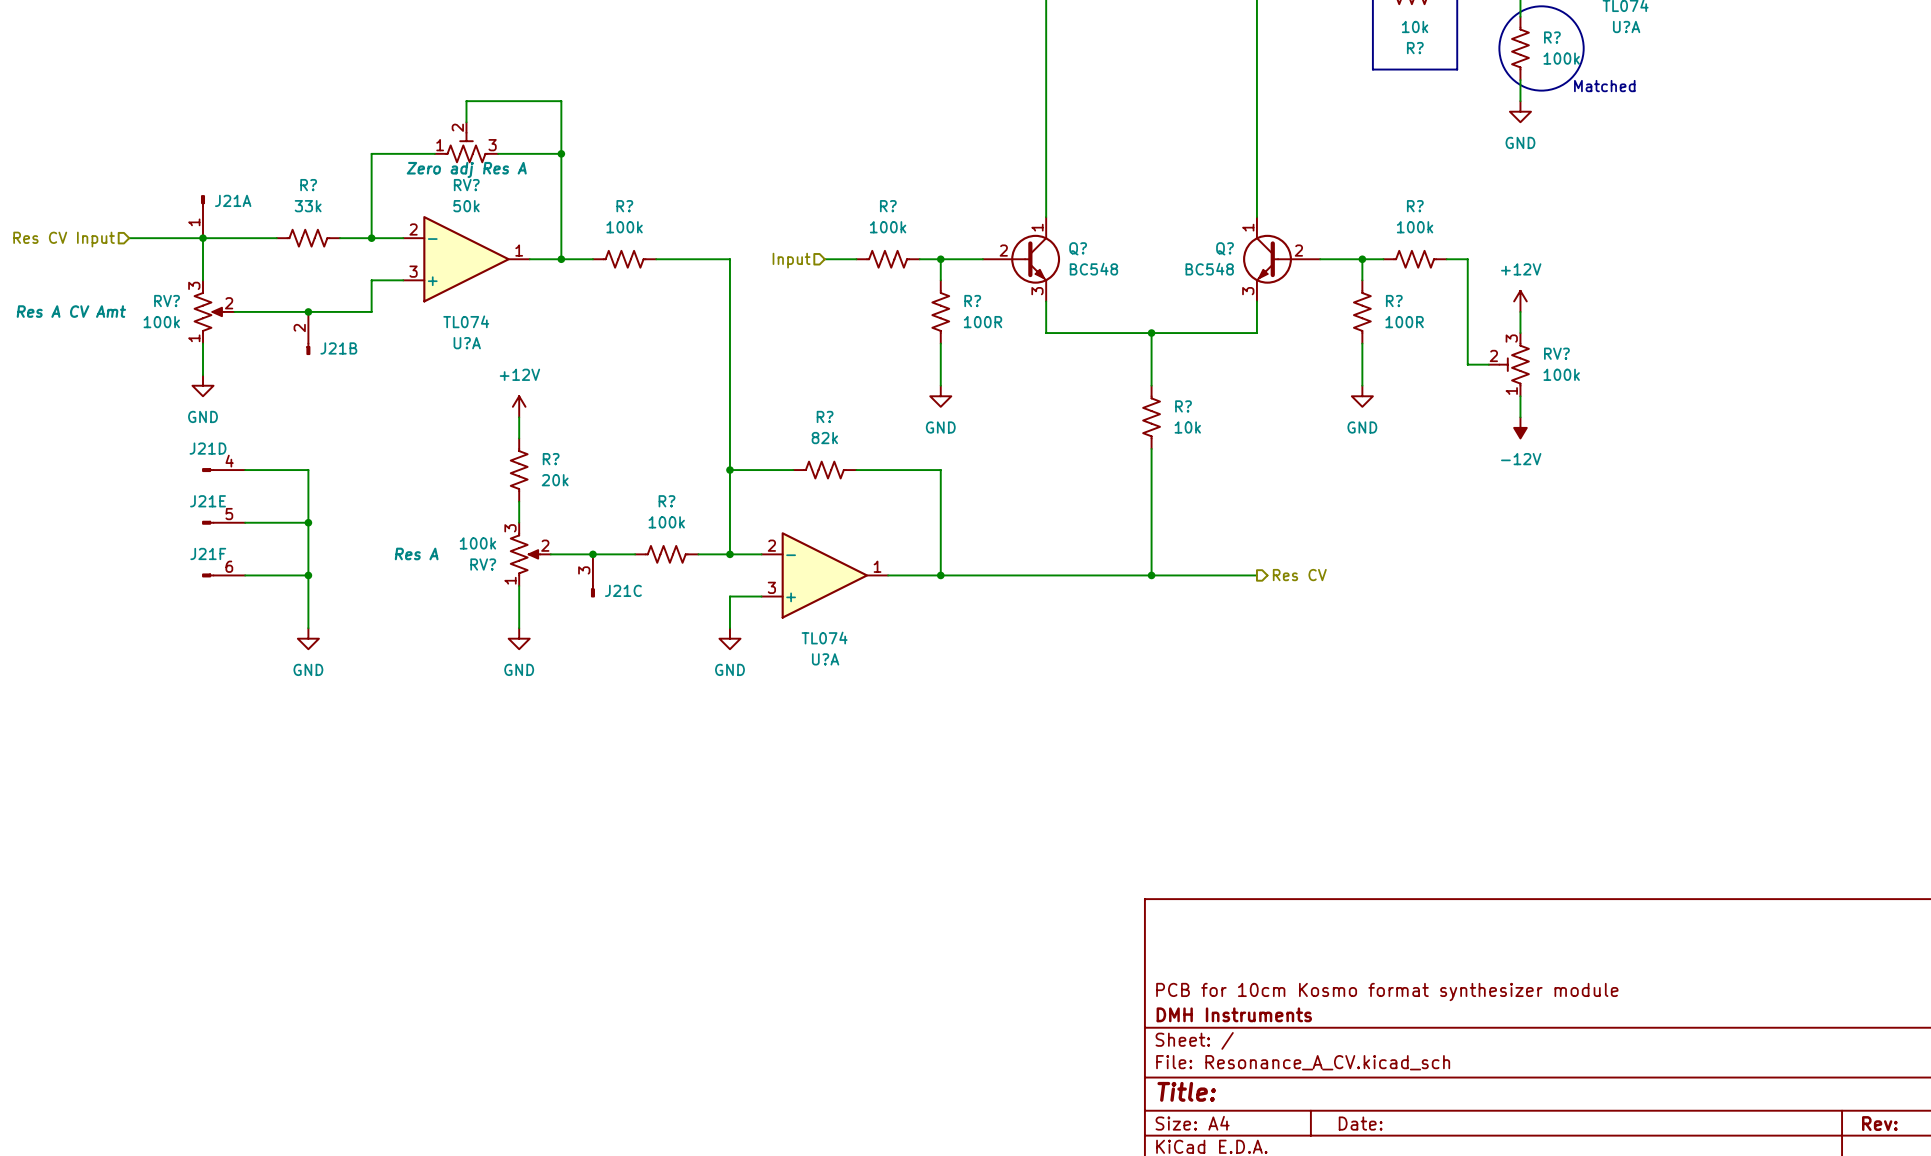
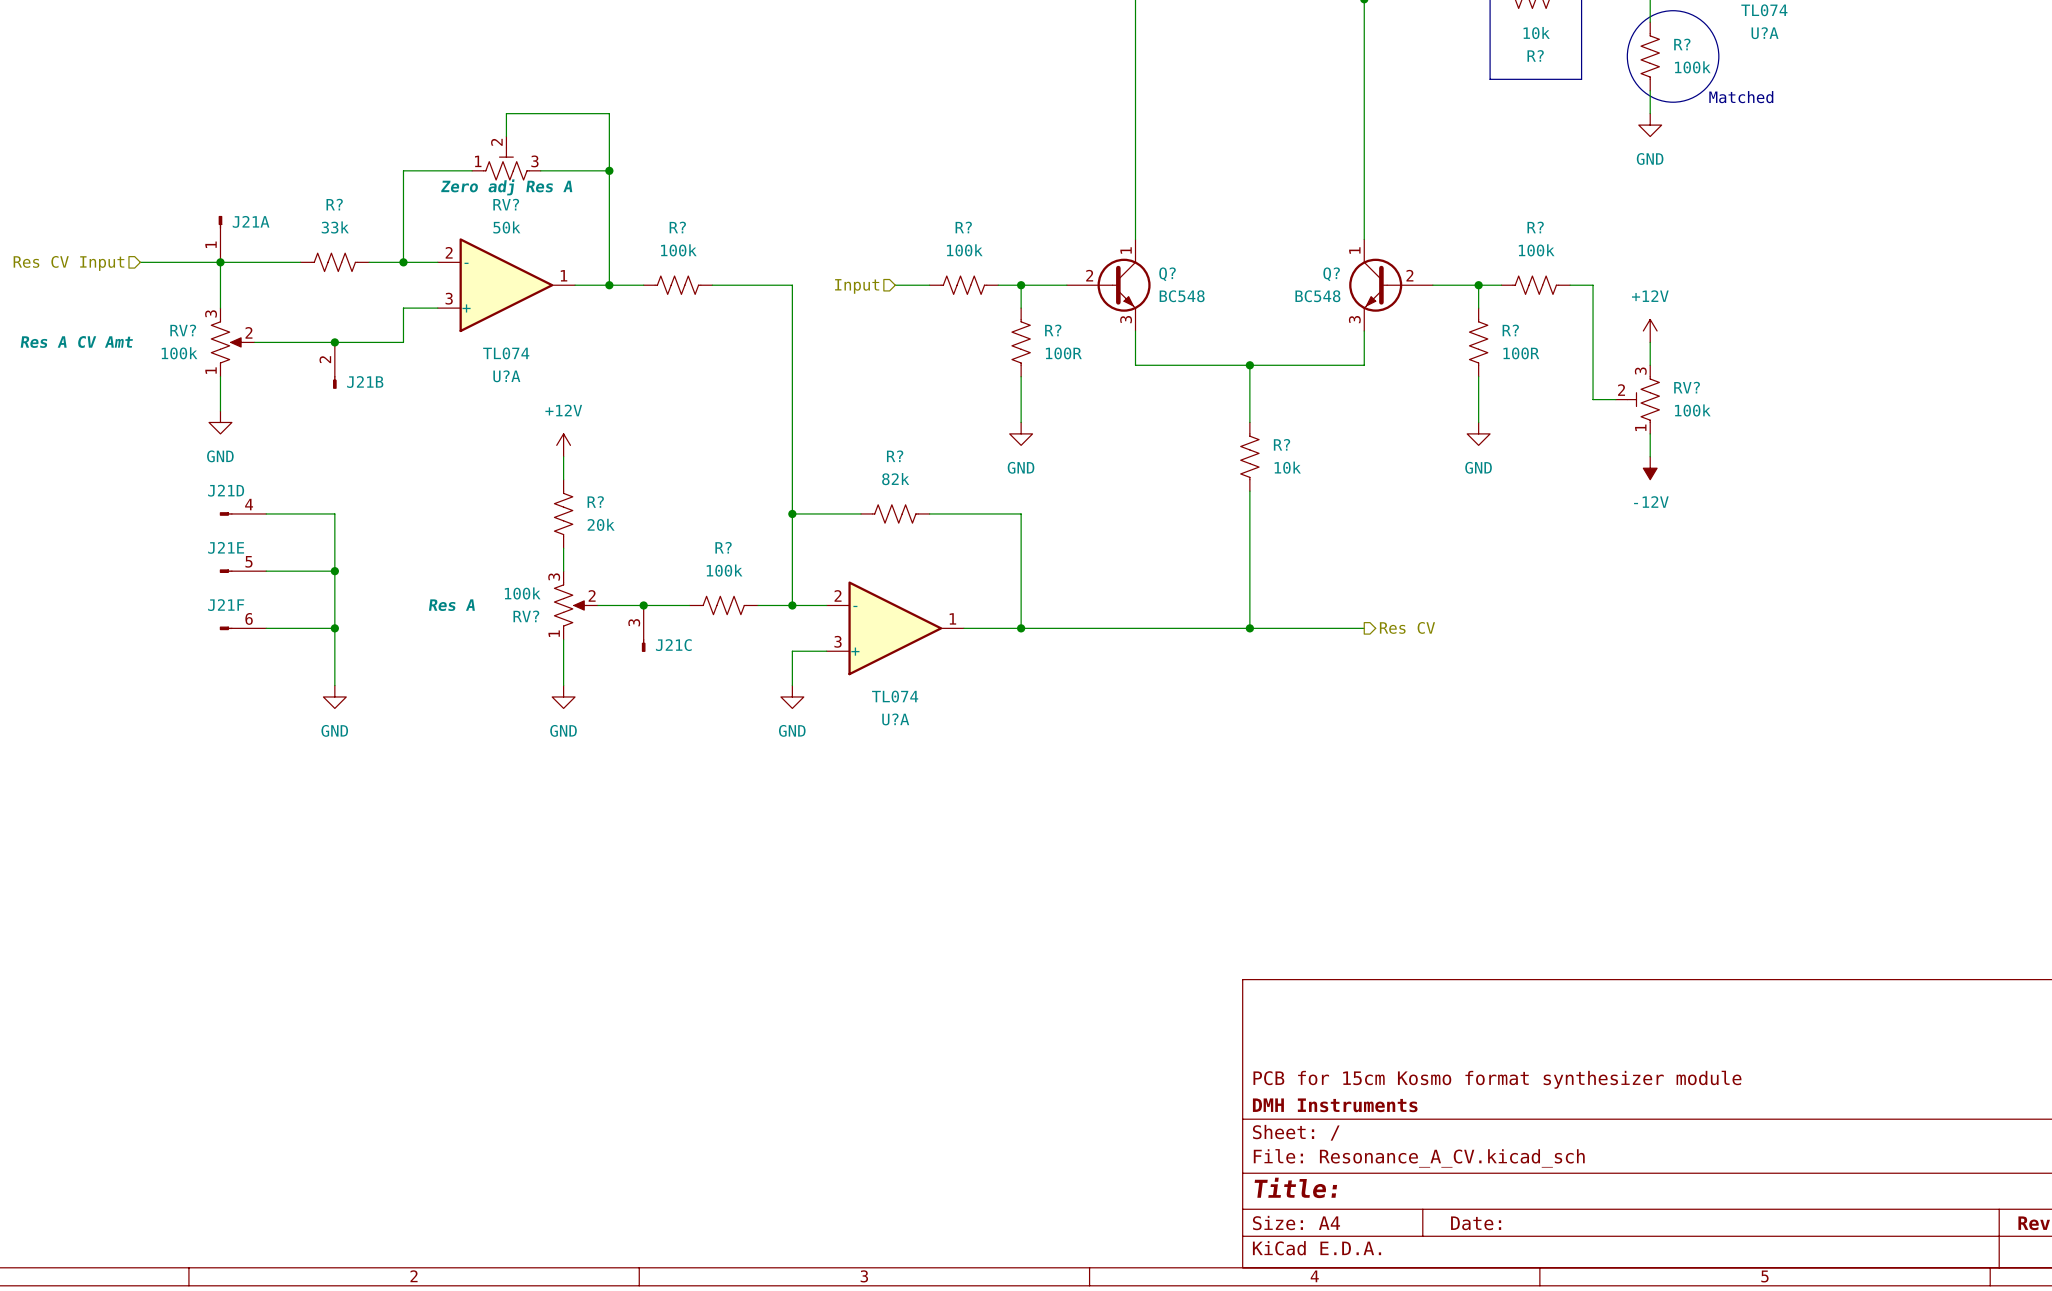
title block: PCB for 10cm Kosmo format synthesizer module (1387, 992) -> PCB for 15cm Kosmo format synthesizer module (1497, 1079)

